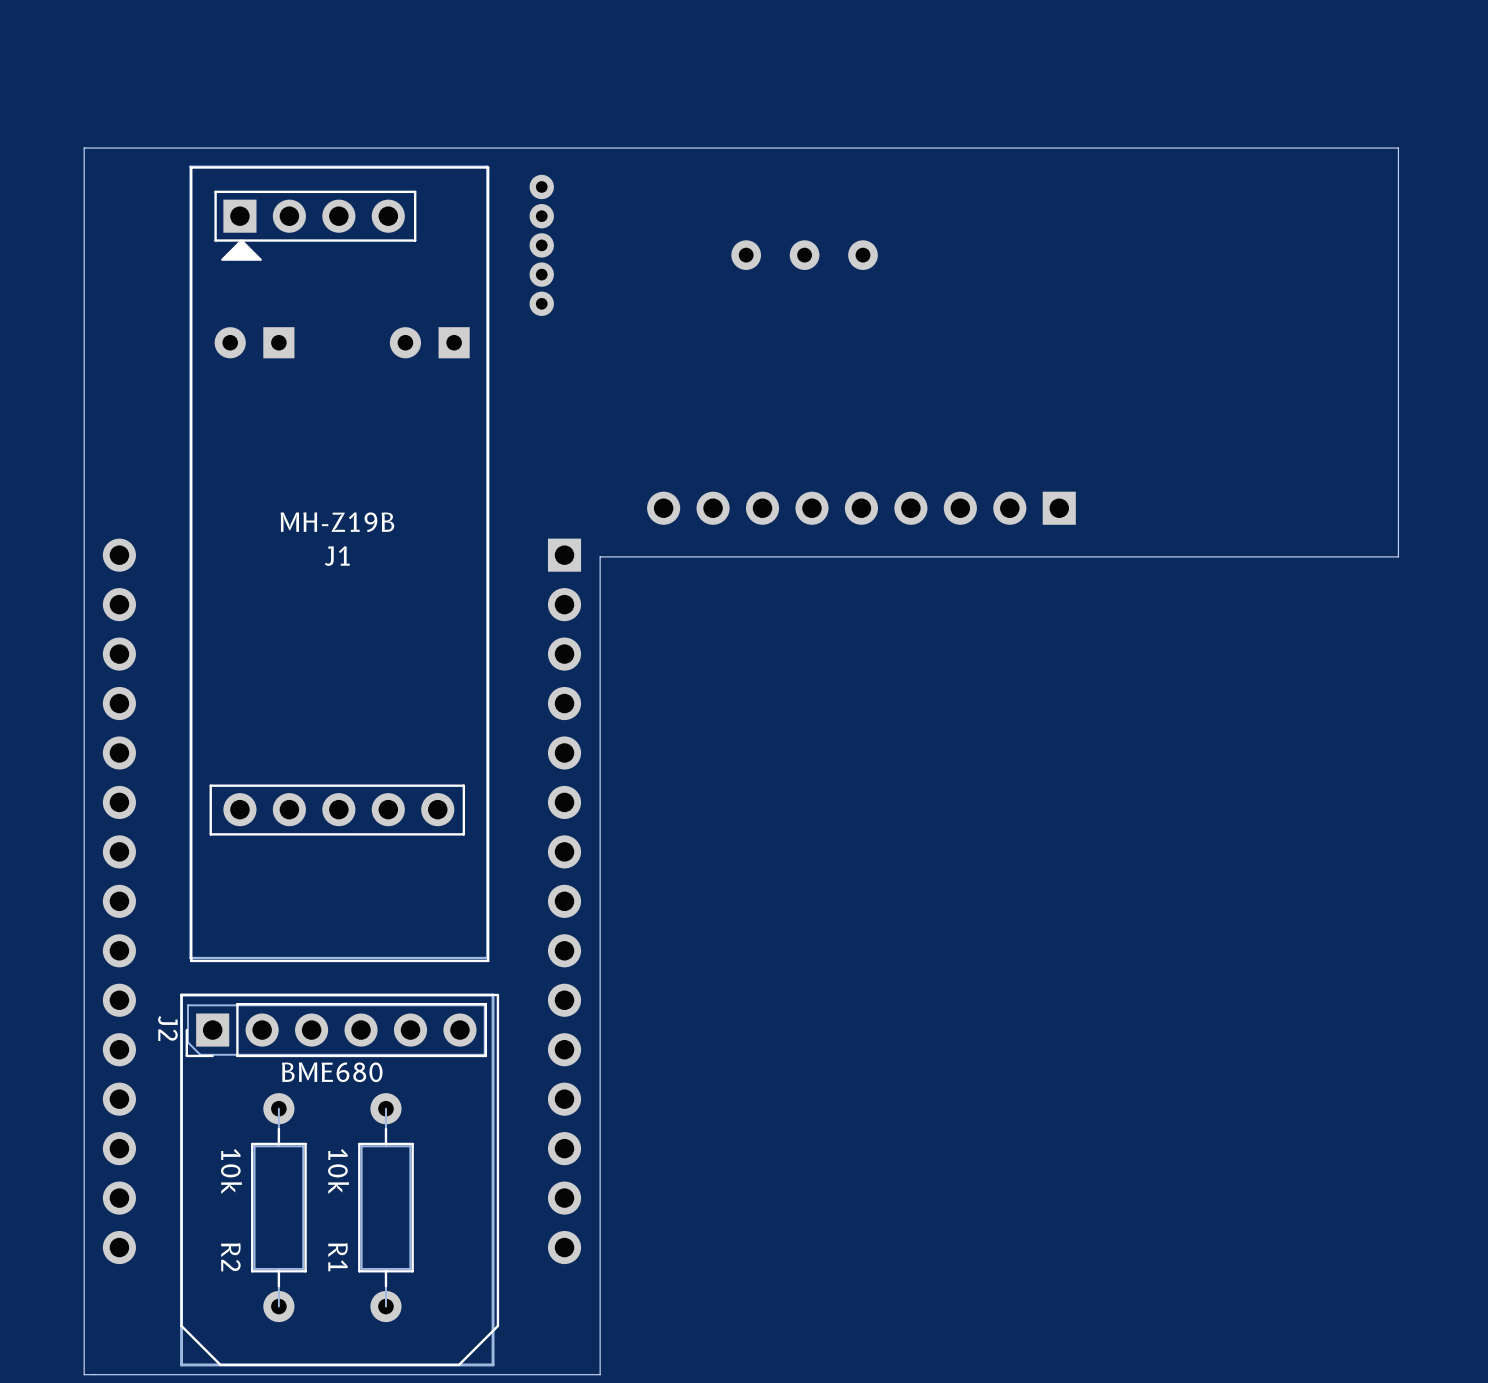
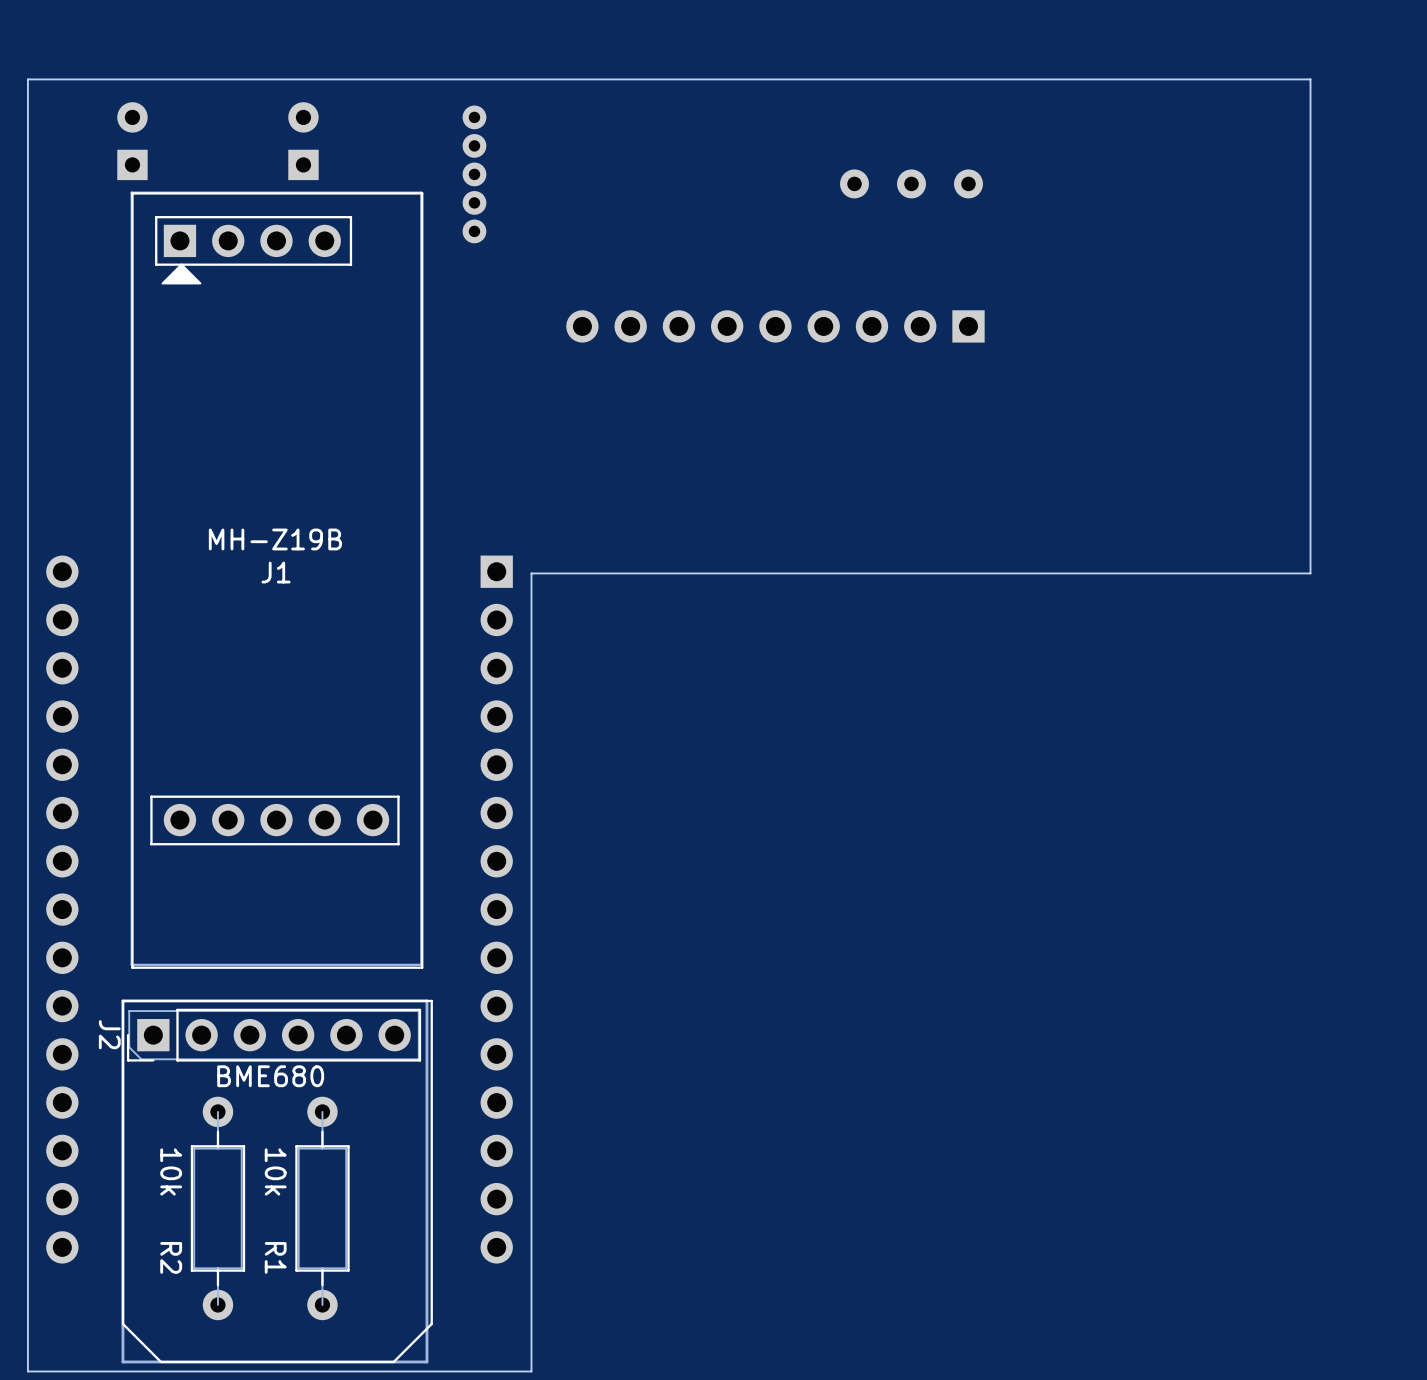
part: none -> (132, 141)
part: none -> (303, 141)
board edge: (1398, 148) (84, 148) -> (1310, 174) (1310, 79) (27, 79) (27, 174)
part position: (541, 245) -> (474, 174)
part position: (804, 255) -> (911, 183)
part: (254, 342) -> none
part: (429, 342) -> none
part position: (861, 508) -> (775, 326)

